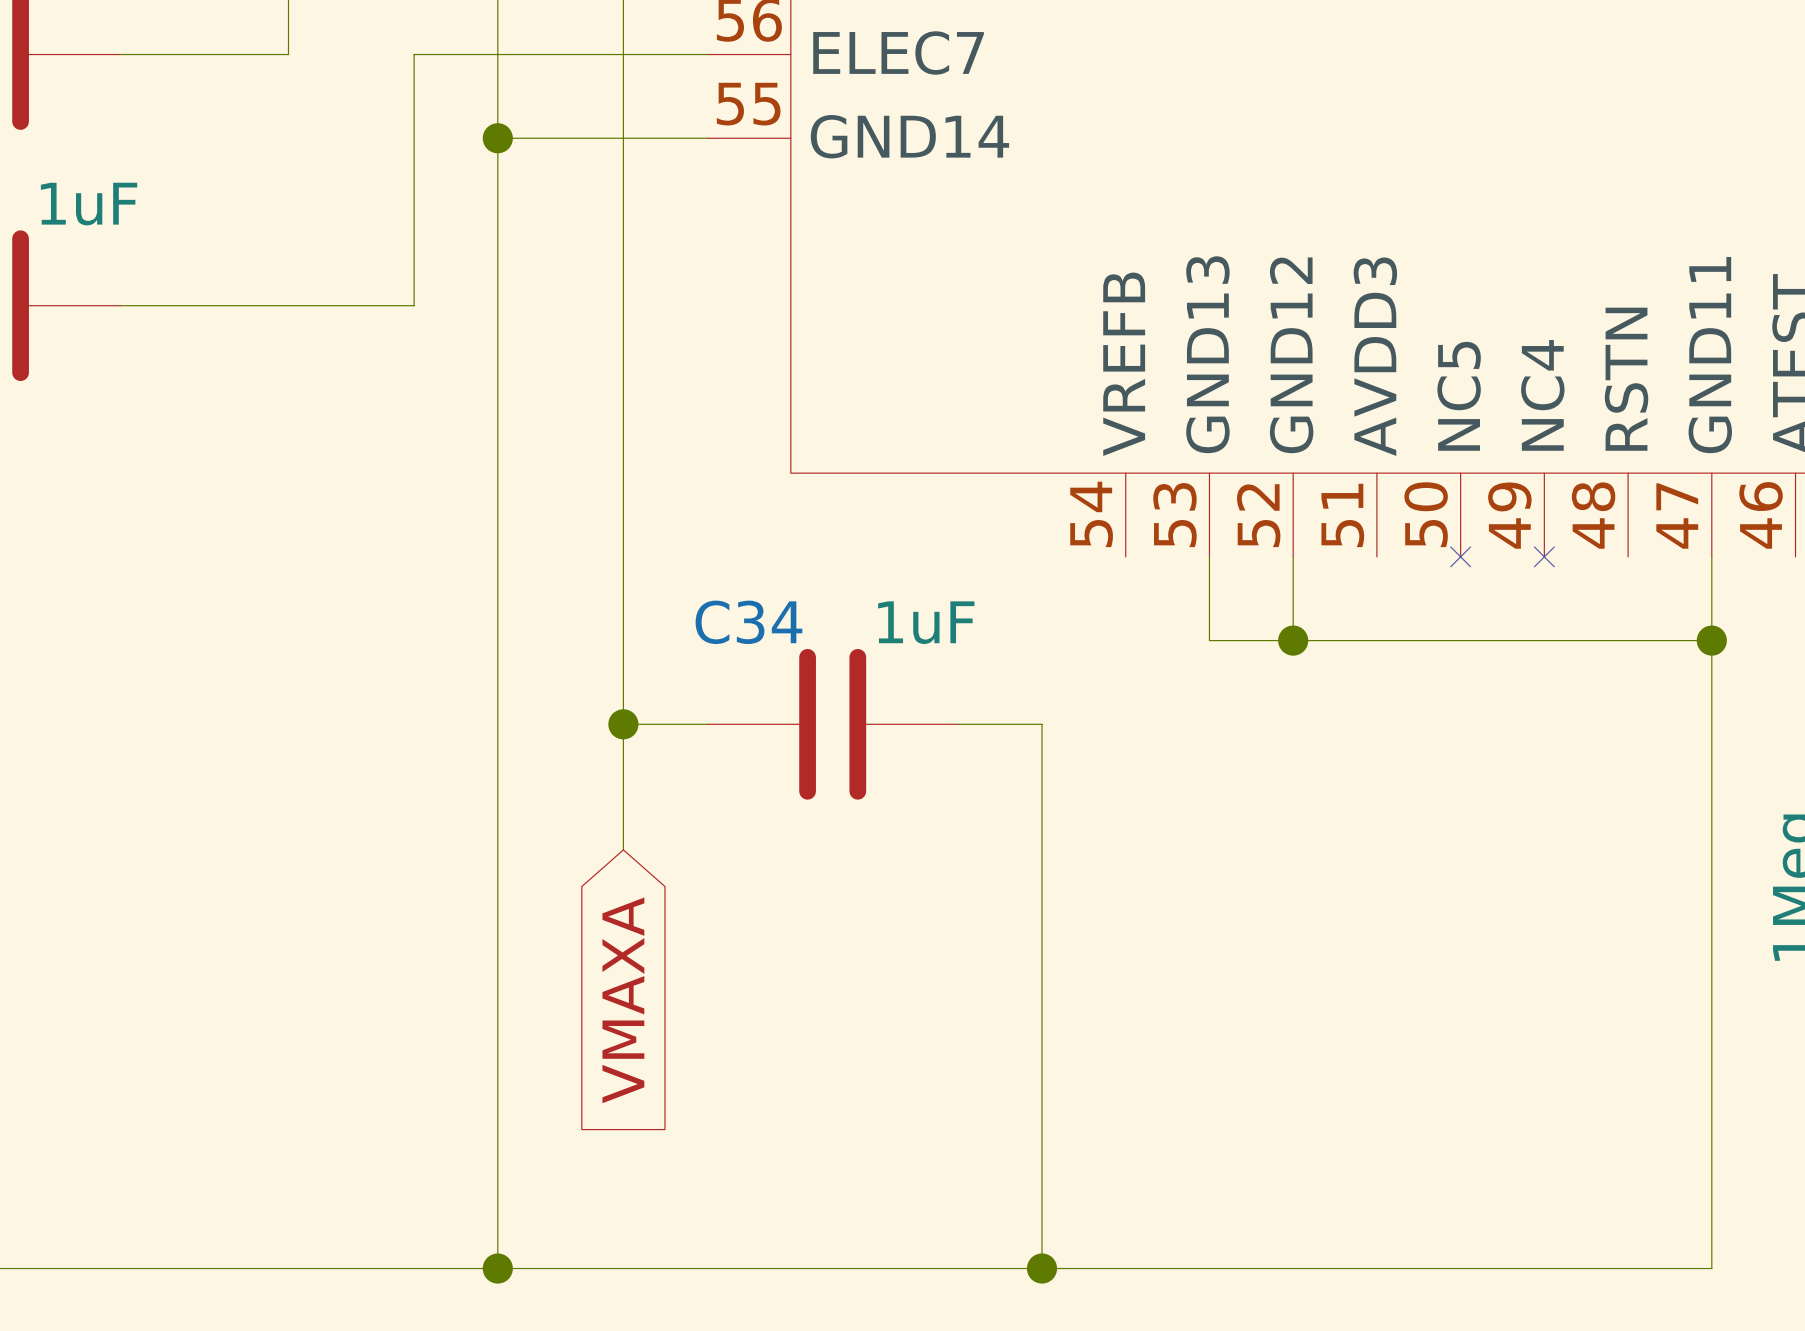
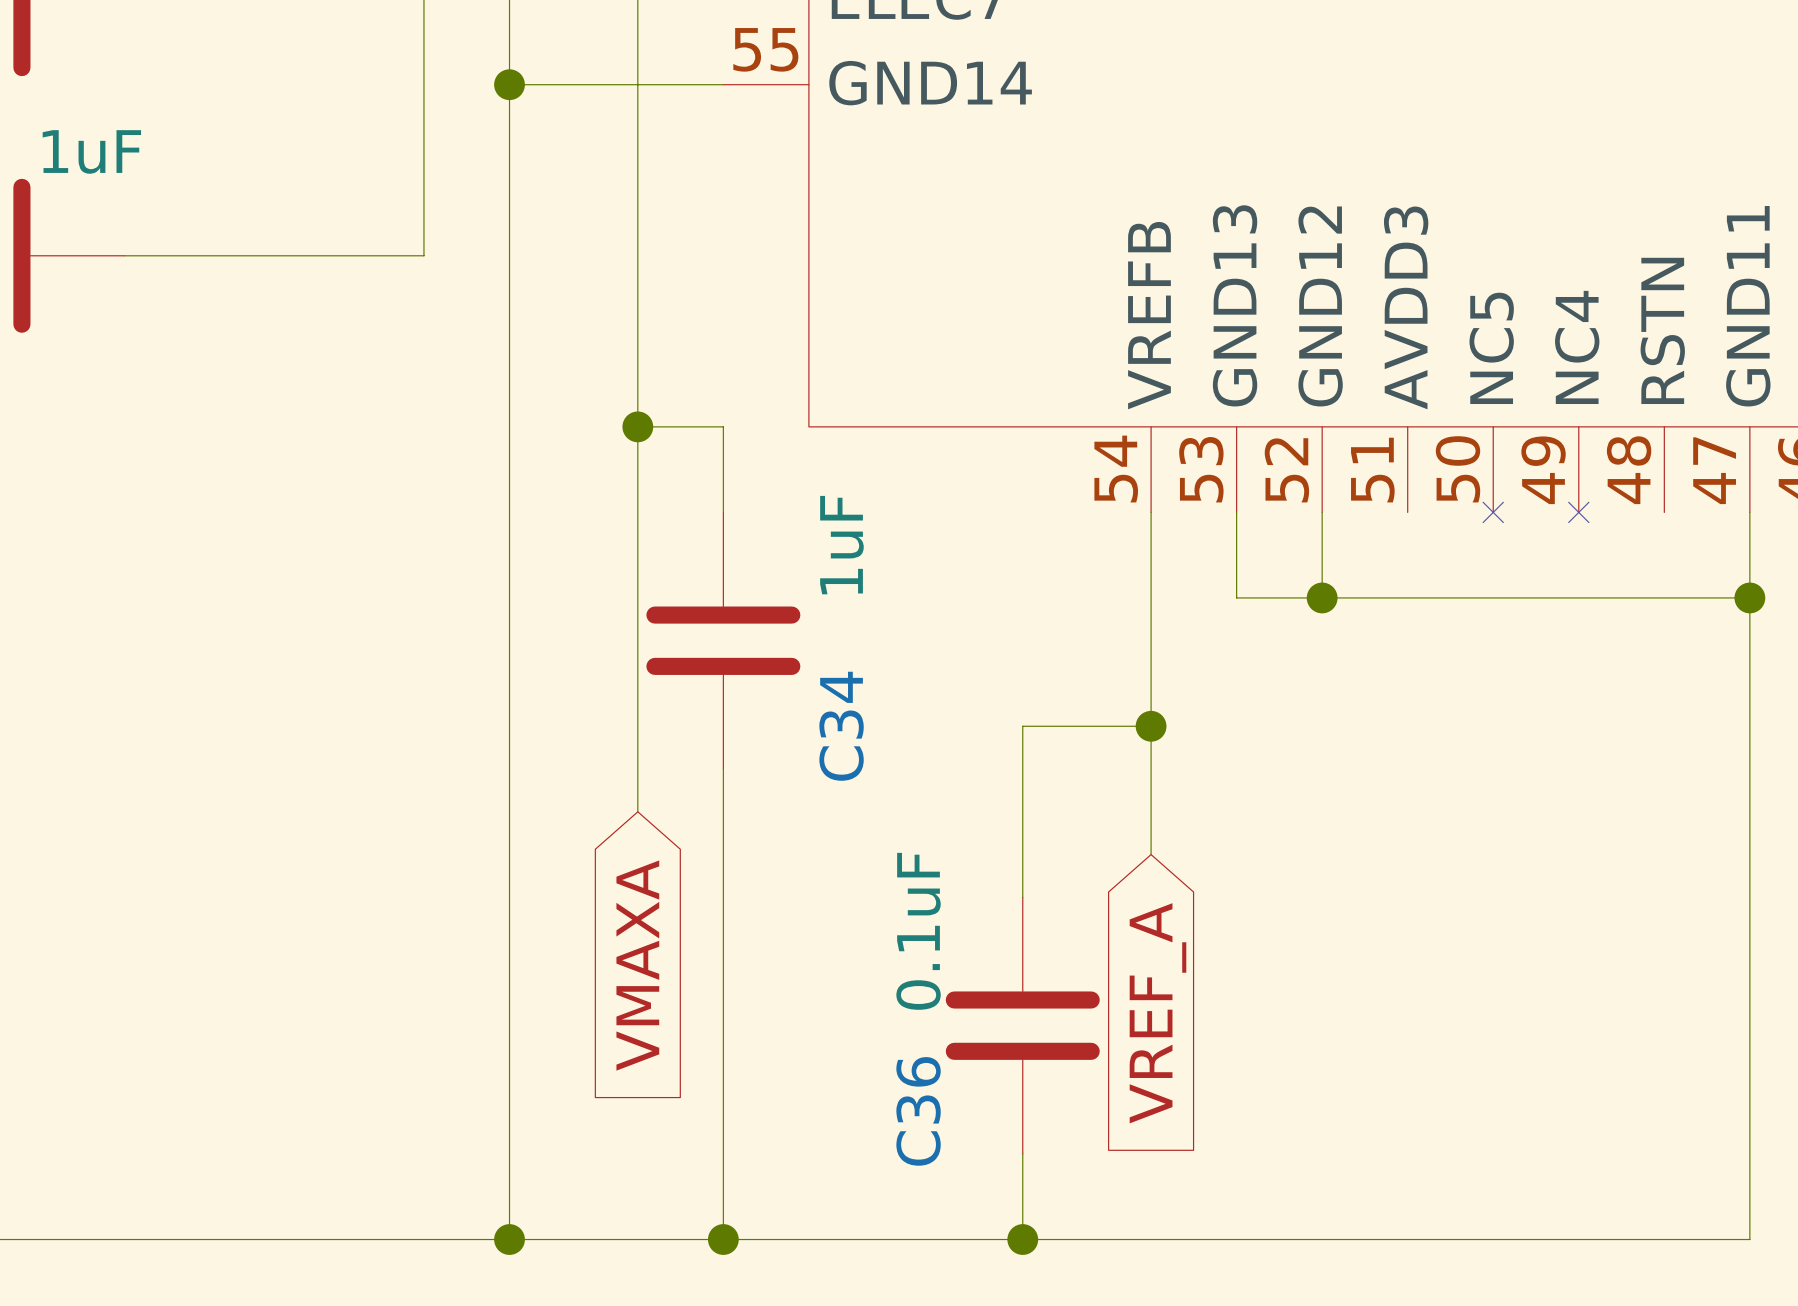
wire: none -> (637, 426) (723, 426) (723, 512)
junction: none -> (637, 426)
wire: none -> (1151, 512) (1151, 854)
C34 name position: C34 (748, 622) -> C34 (841, 726)
wire: (623, 724) (707, 724) -> none
junction: (623, 724) -> none
C34 rotation: 0° (832, 724) -> 90° clockwise (723, 640)
wire: (958, 724) (1042, 724) (1042, 1268) -> none
wire: none -> (1151, 726) (1022, 726) (1022, 897)
junction: none -> (1151, 726)
wire: none -> (723, 769) (723, 1239)
global label: none -> VREF_A (1157, 1013)
C36: none -> 0.1uF (1022, 1025)
wire: none -> (1022, 1153) (1022, 1239)
junction: none -> (723, 1239)
junction position: (1042, 1268) -> (1022, 1239)

